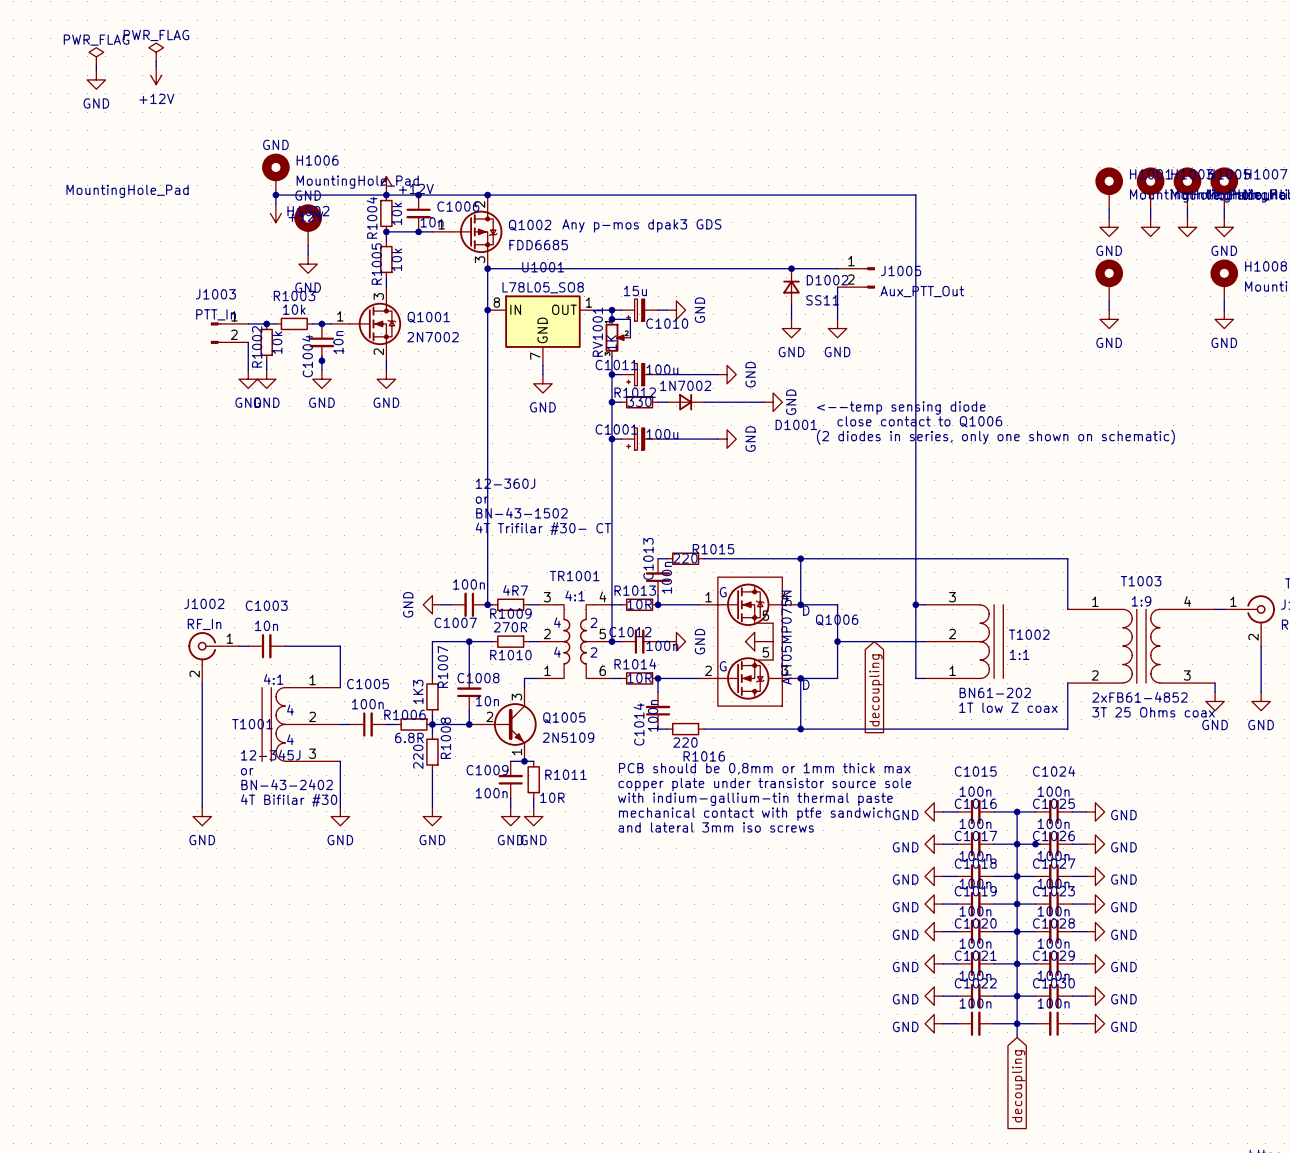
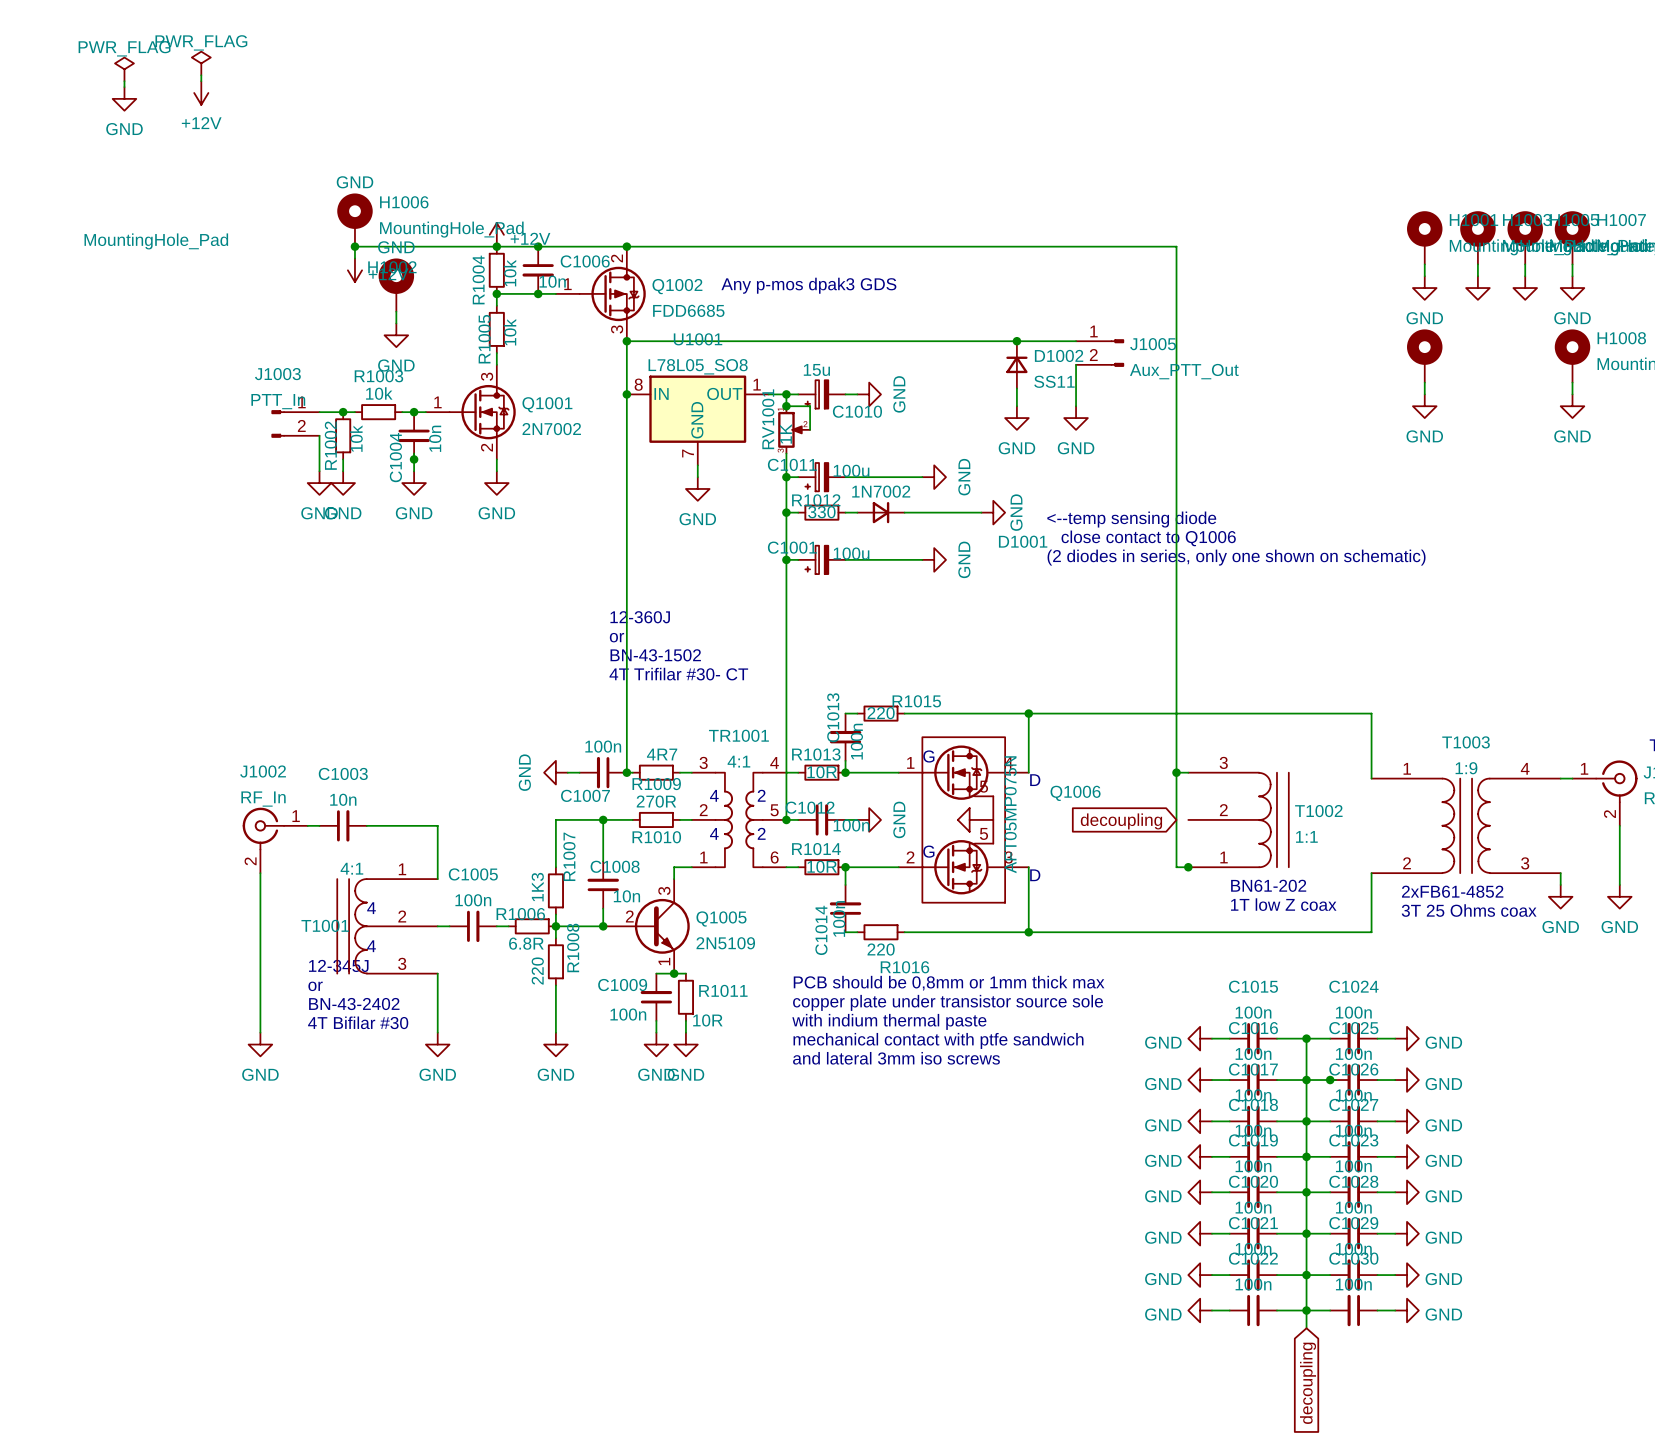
wire: (800, 604) (837, 604) (837, 678) (800, 678) -> none
junction: (800, 604) -> none
wire: (837, 641) (925, 641) -> none
junction: (837, 641) -> none
junction: (800, 678) -> none
junction: none -> (1188, 867)
global label rotation: 0° (875, 690) -> 90° clockwise (1121, 821)
text: with indium-gallium-tin thermal paste (755, 799) -> with indium thermal paste (889, 1021)

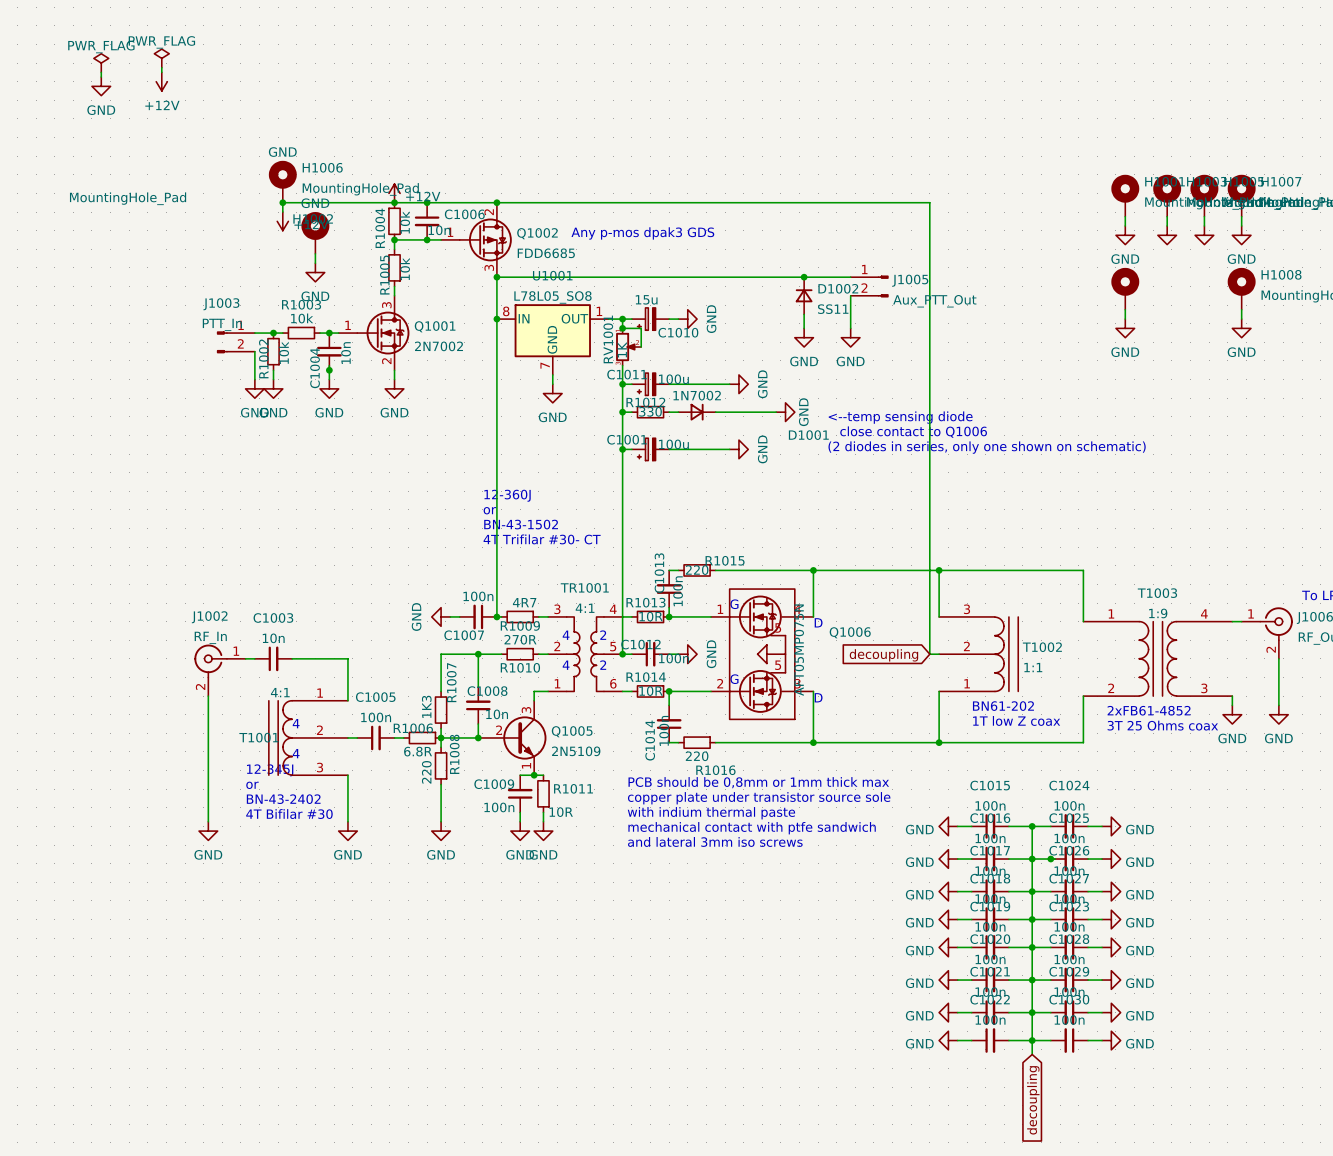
junction: none -> (939, 570)
wire: (1176, 772) (1188, 772) -> (939, 570) (939, 616)
junction: (1176, 772) -> none
wire: (1176, 819) (1176, 867) (1188, 867) -> (929, 654) (939, 654)
wire: none -> (939, 691) (939, 742)
junction: (1188, 867) -> none
junction: none -> (939, 742)

